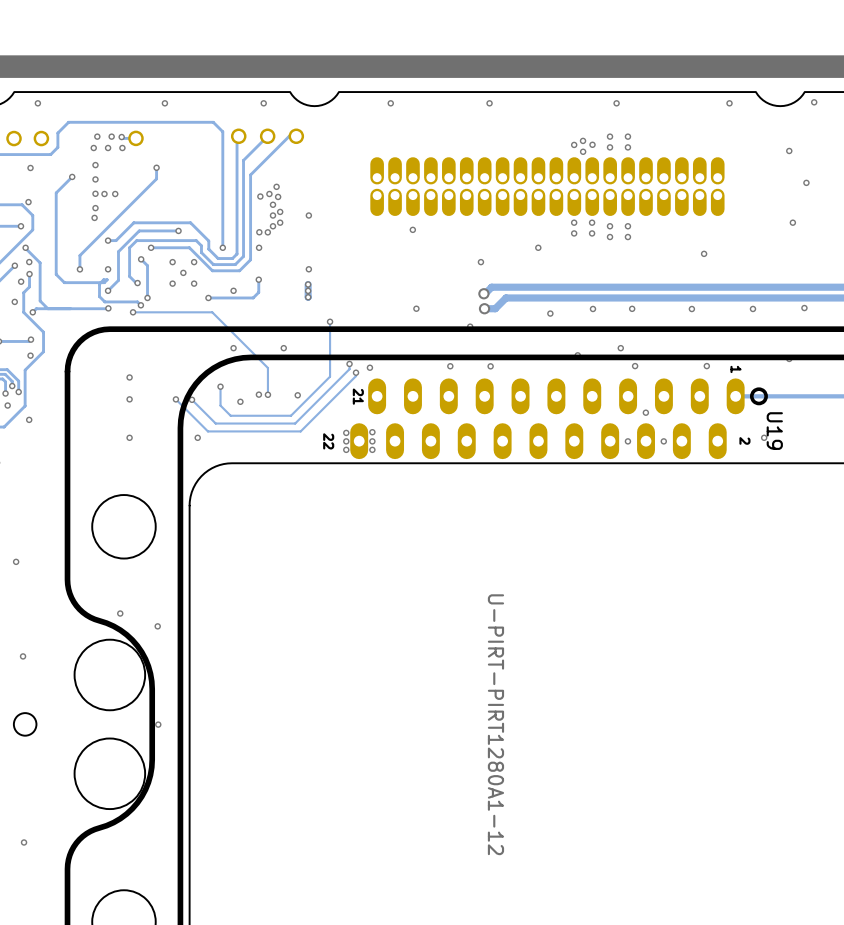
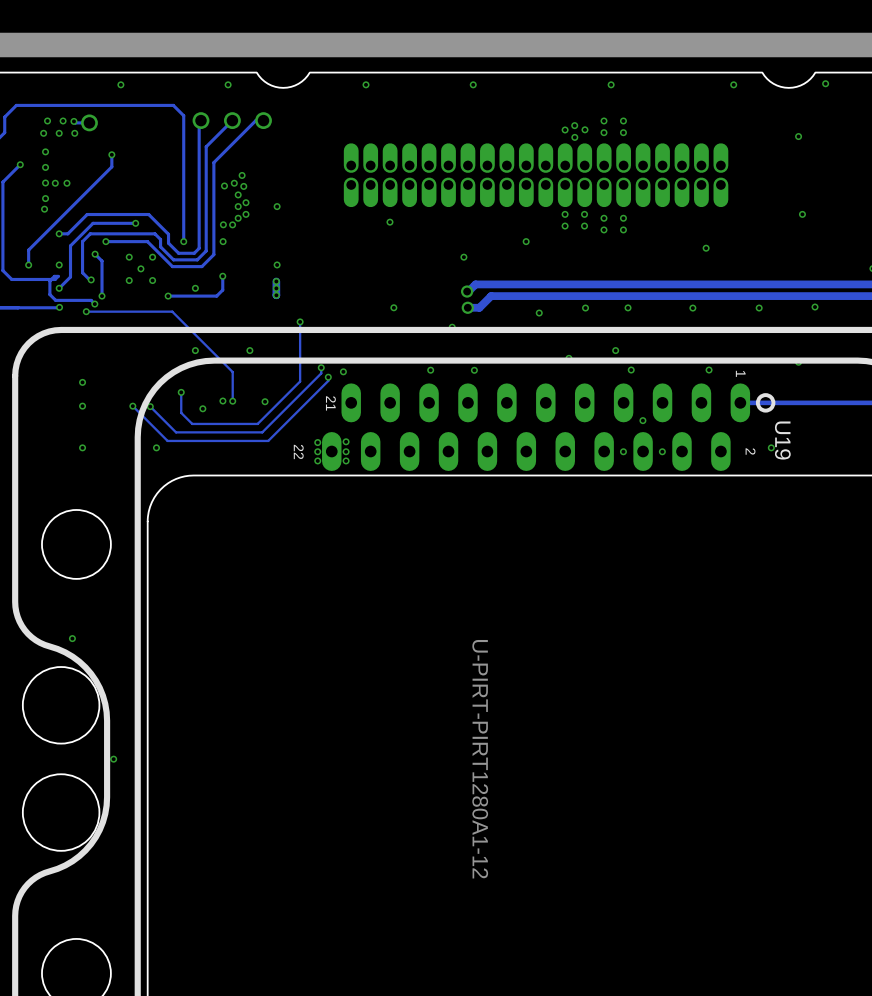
via: (806, 182) -> none
via: (157, 626) -> none

